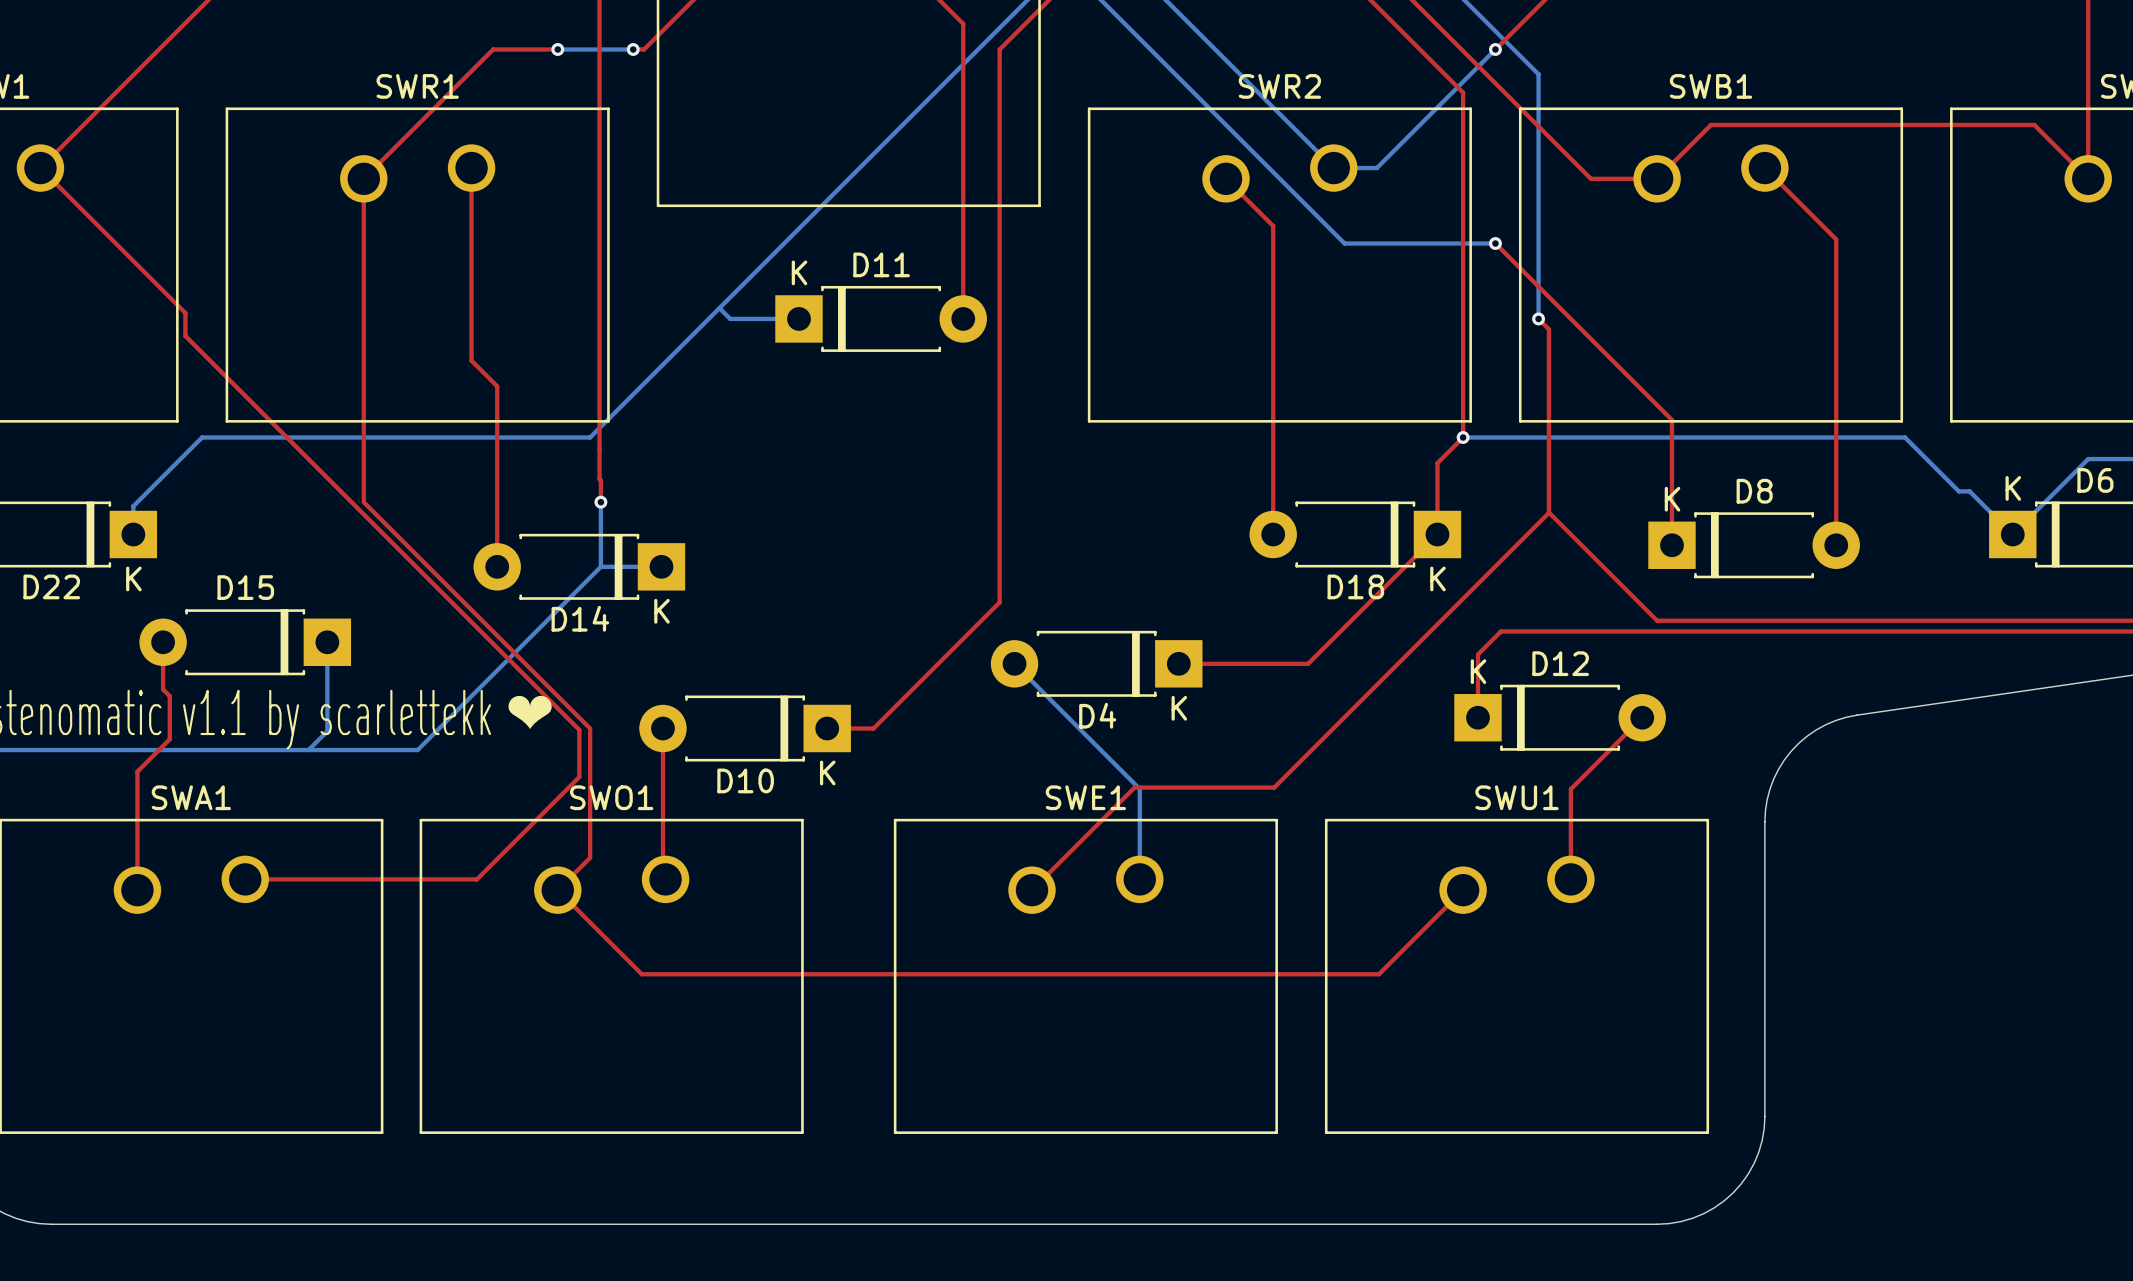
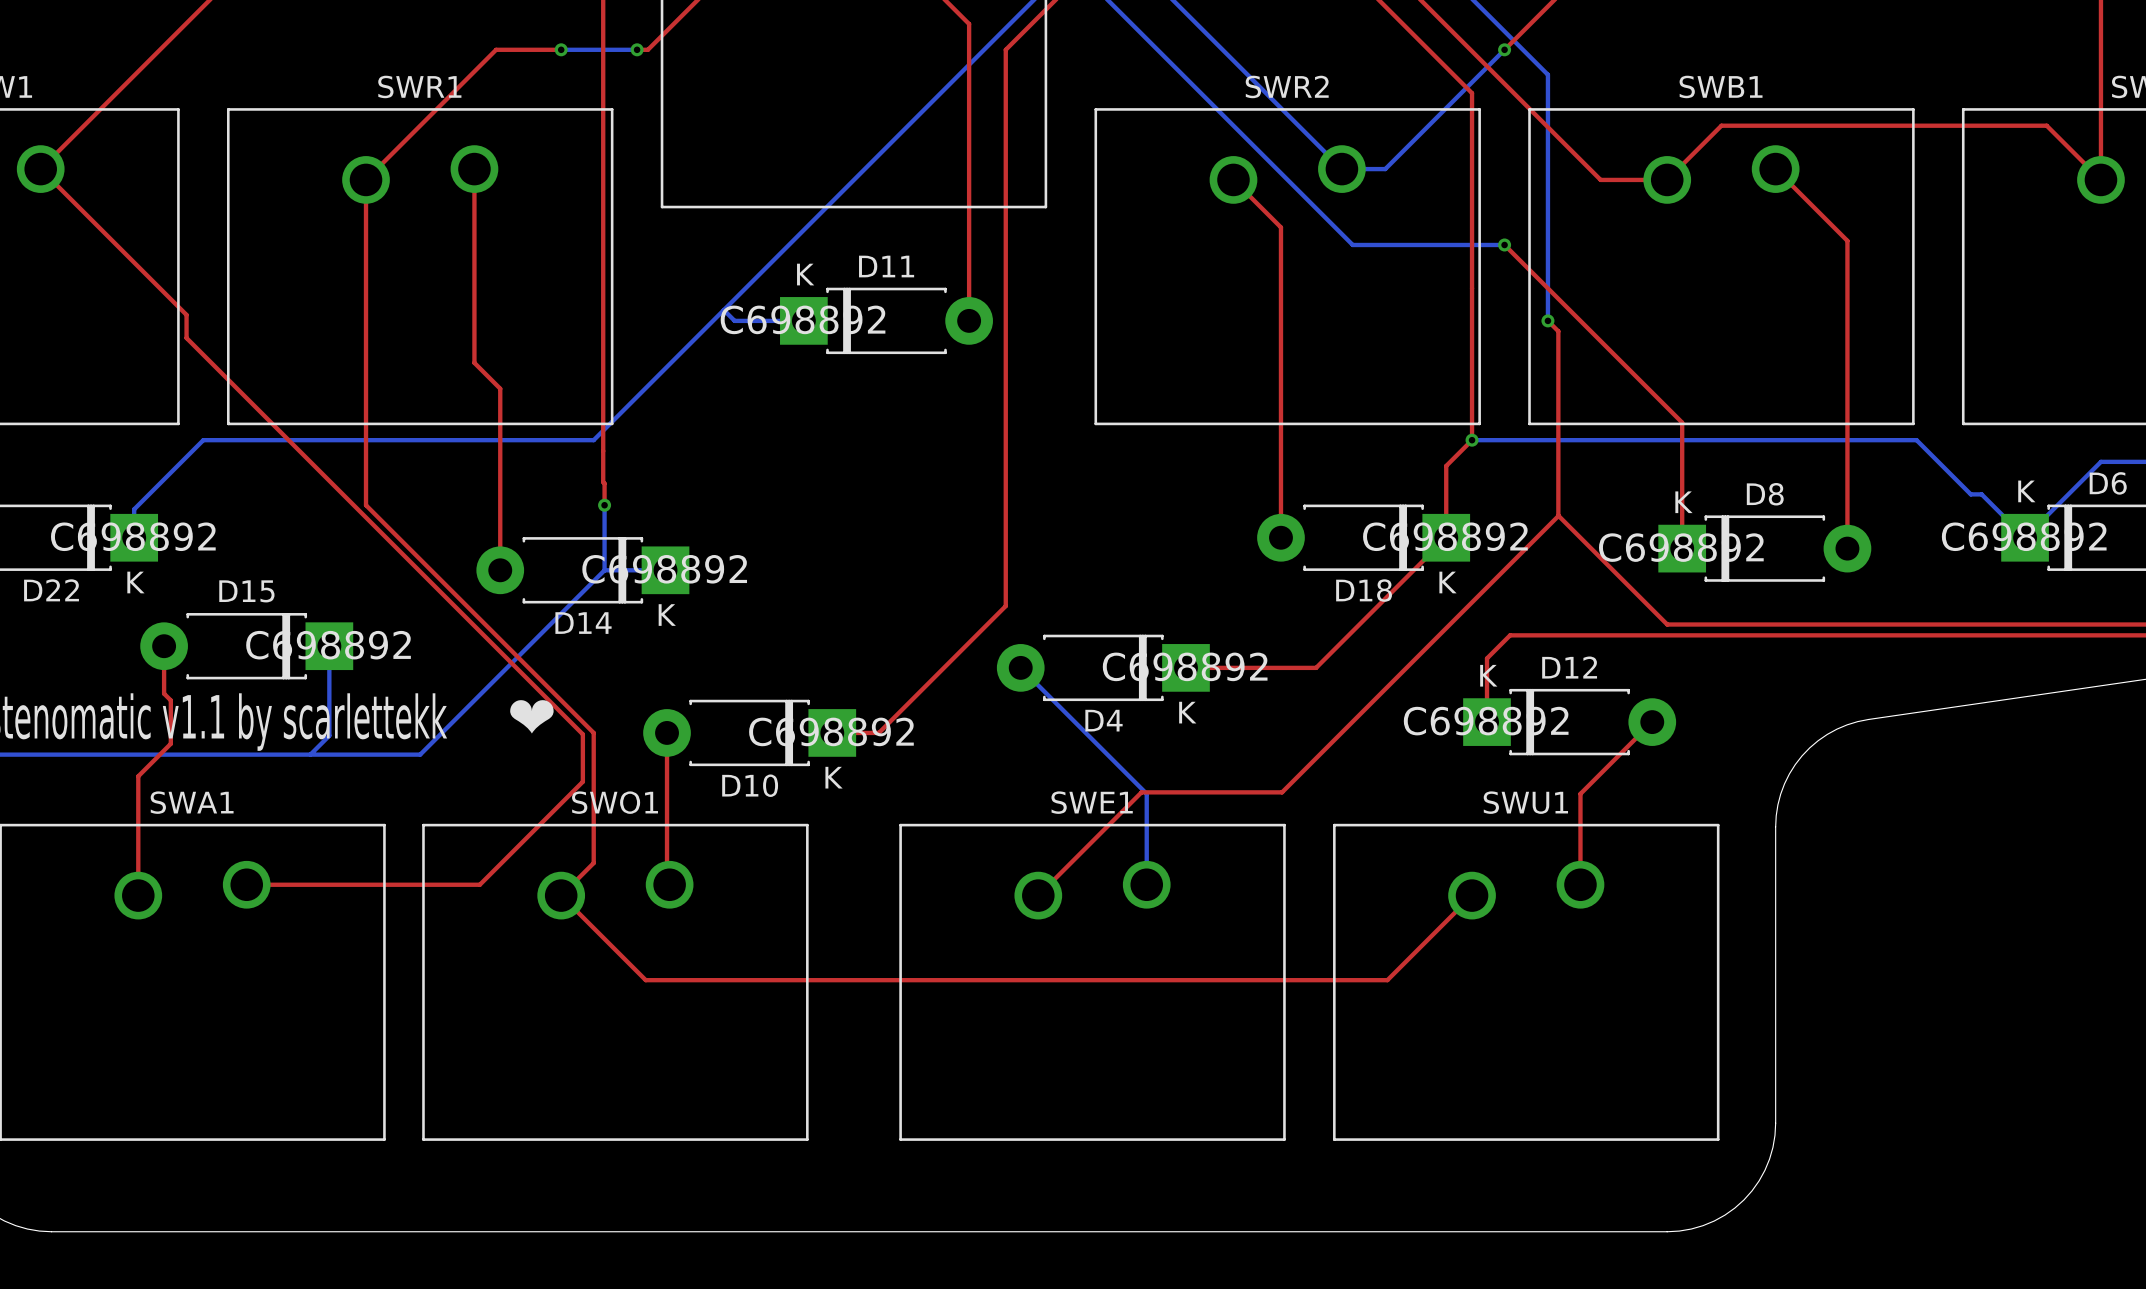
D11 text: none -> C698892 (803, 319)
D22 text: none -> C698892 (133, 536)
D18 text: none -> C698892 (1445, 536)
D6 text: none -> C698892 (2024, 536)
D8 text: none -> C698892 (1681, 547)
D14 text: none -> C698892 (664, 569)
D15 text: none -> C698892 (328, 645)
D4 text: none -> C698892 (1185, 666)
D12 text: none -> C698892 (1486, 721)
D10 text: none -> C698892 (831, 731)

